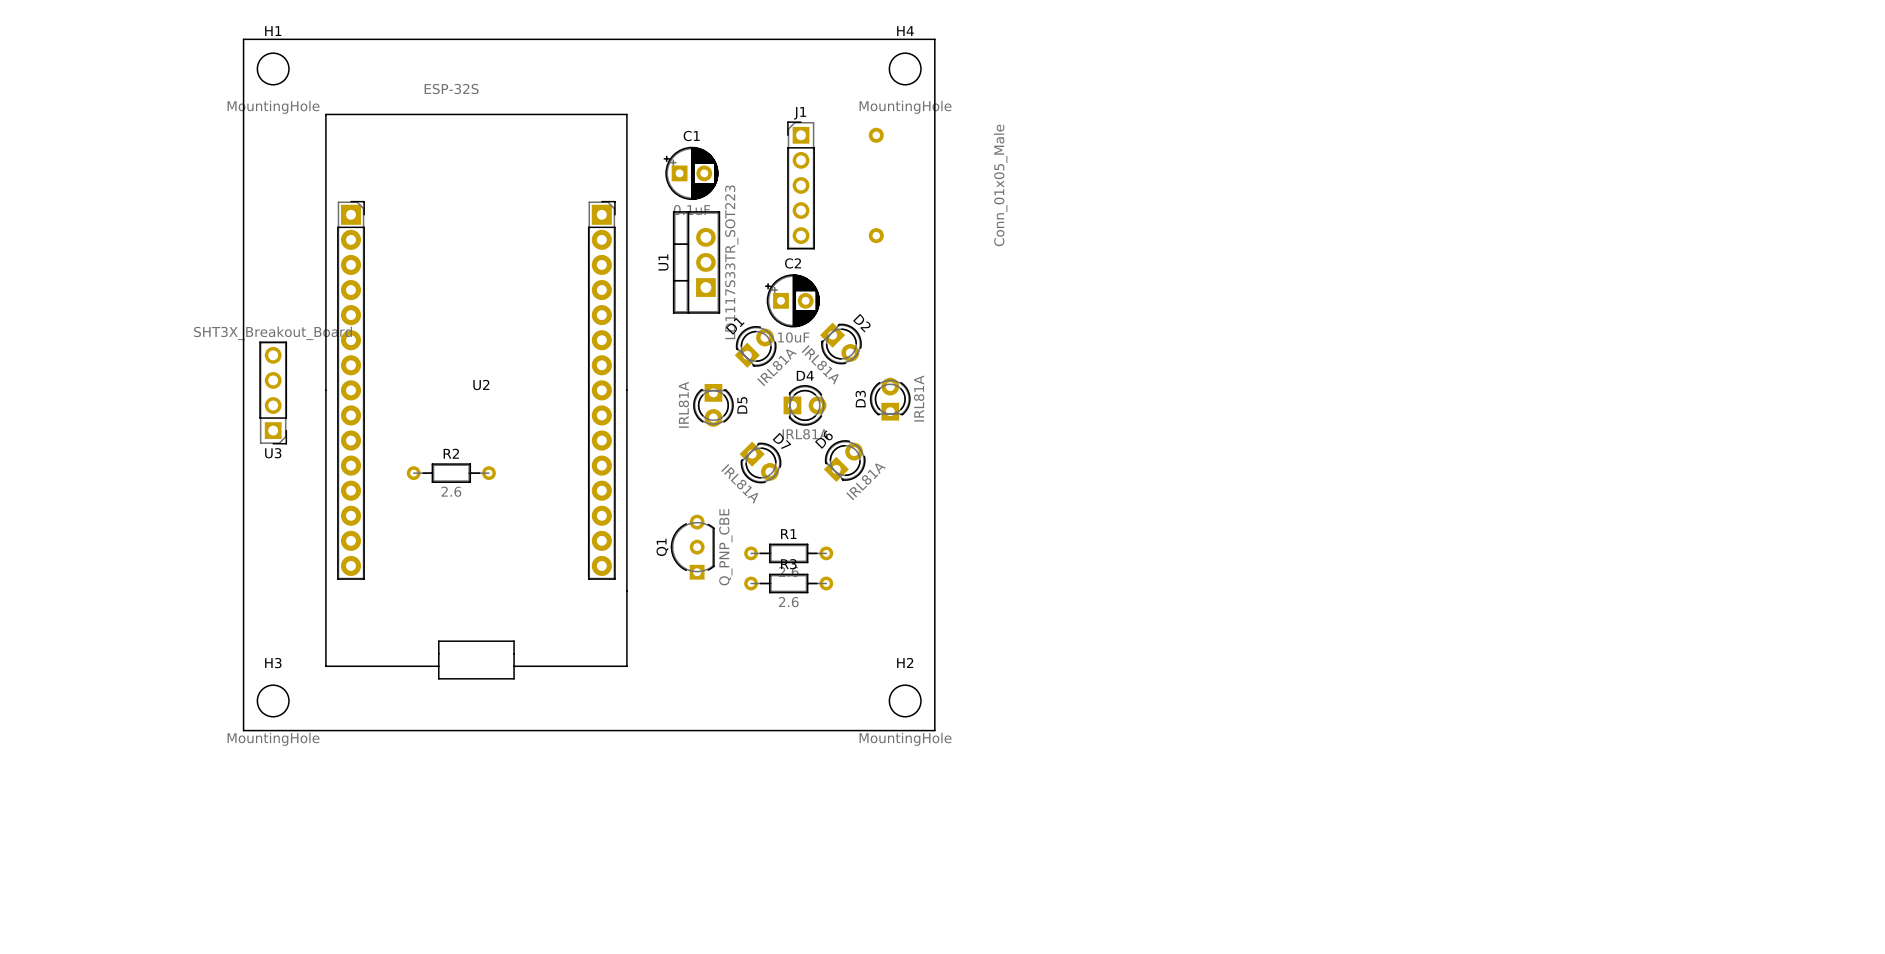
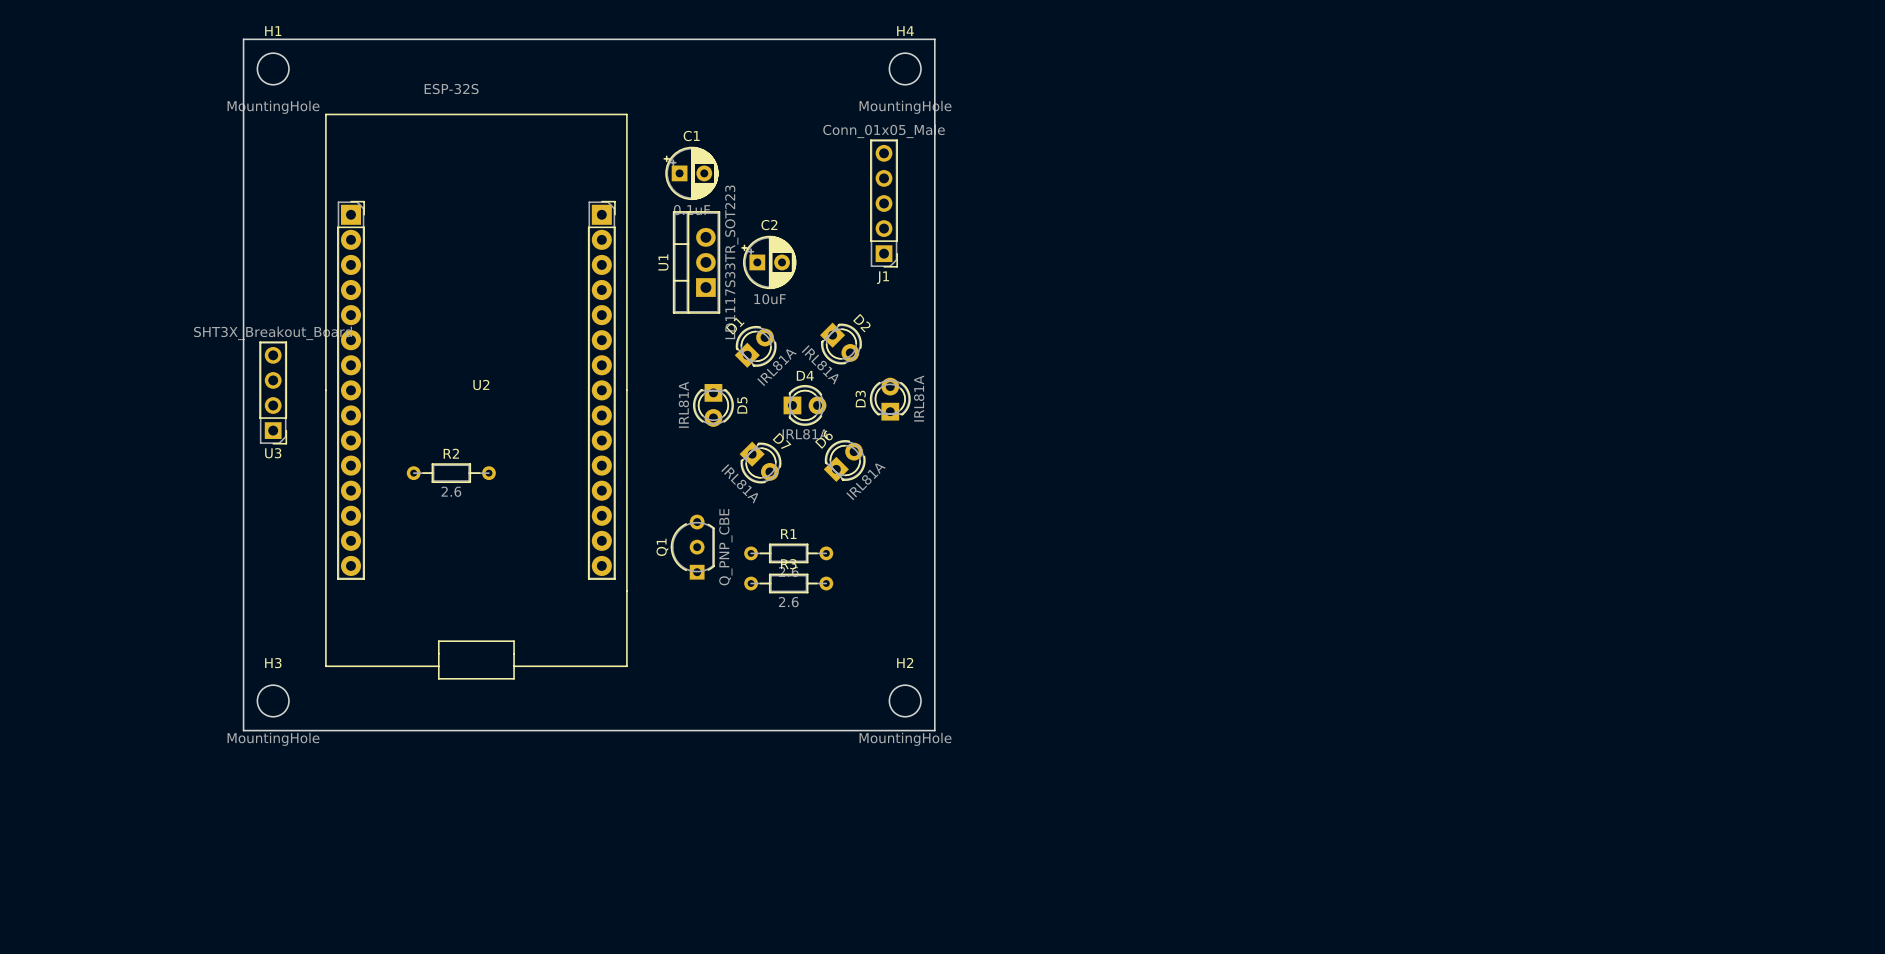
J1 name position: J1 (800, 113) -> J1 (883, 277)
J1 footprint: [787, 121, 884, 250] -> [870, 139, 898, 268]
J1 value position: Conn_01x05_Male (1000, 185) -> Conn_01x05_Male (884, 131)
C2 position: (792, 300) -> (768, 262)

